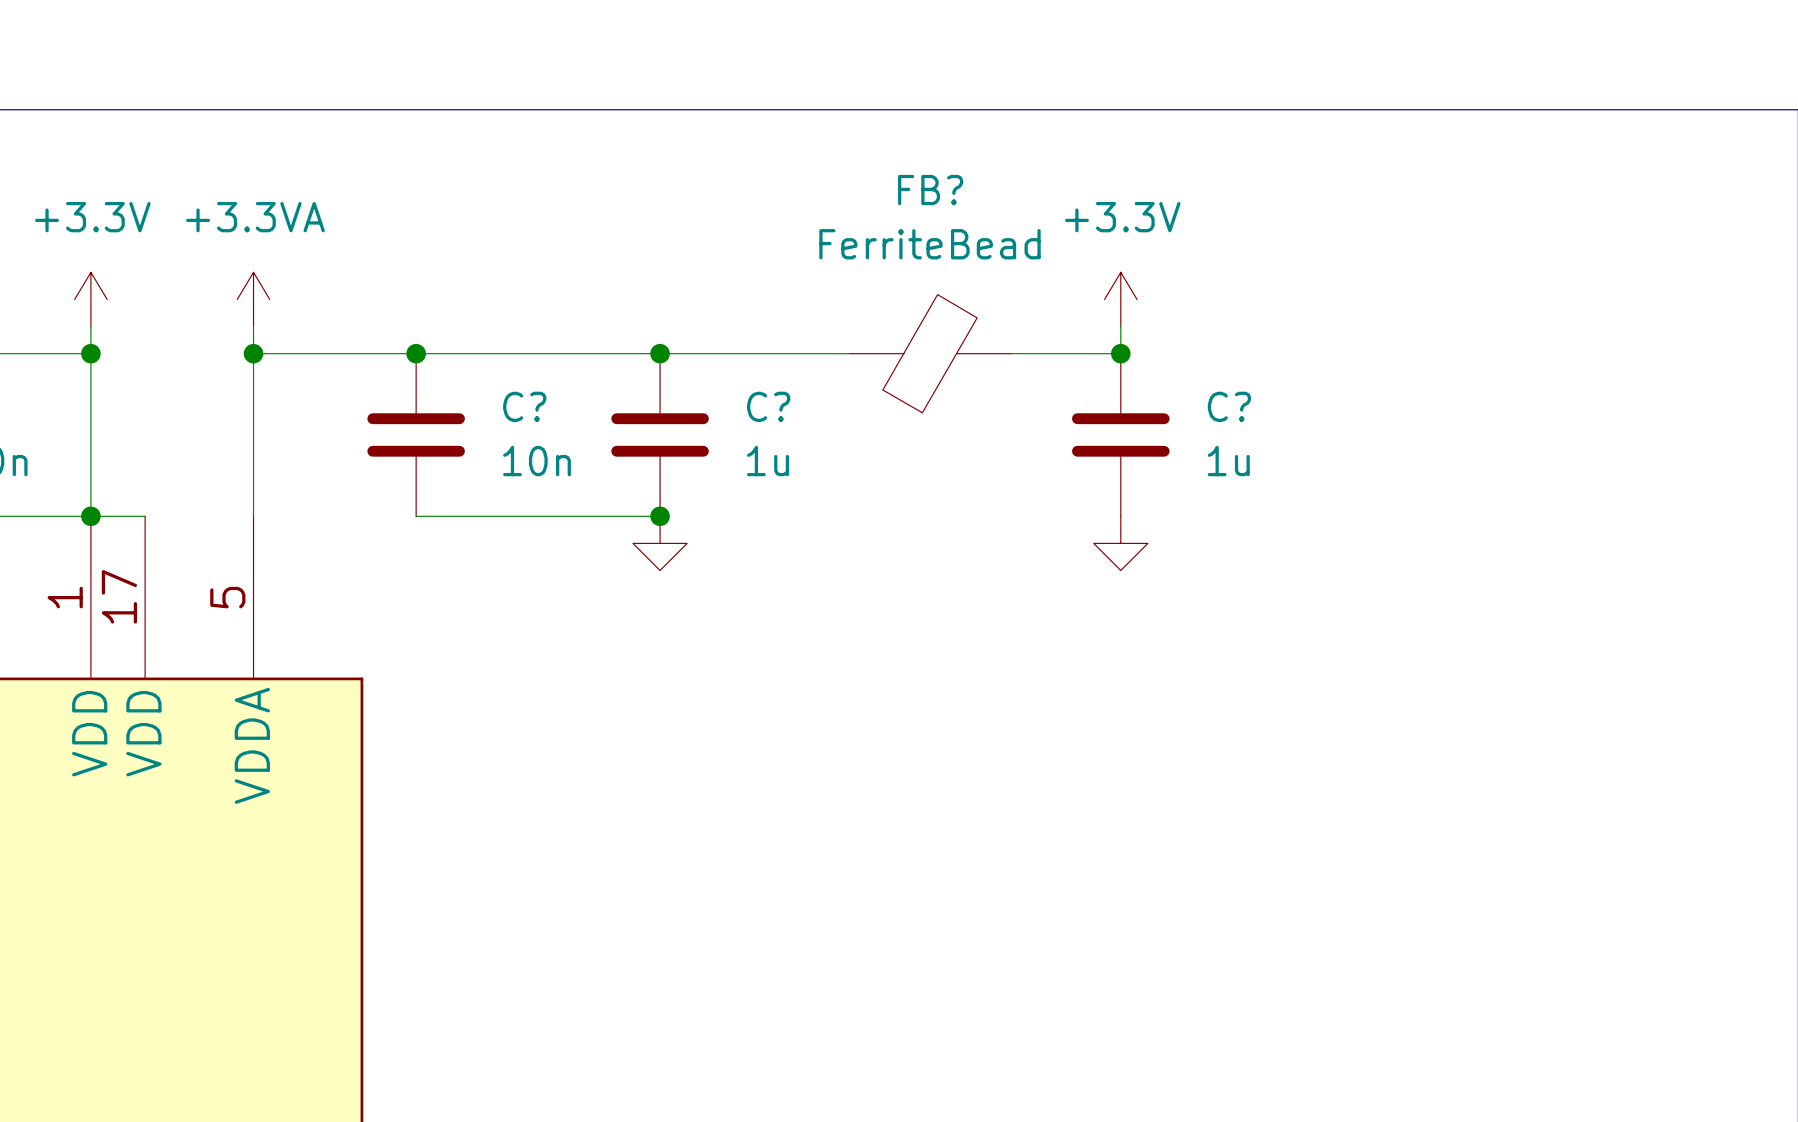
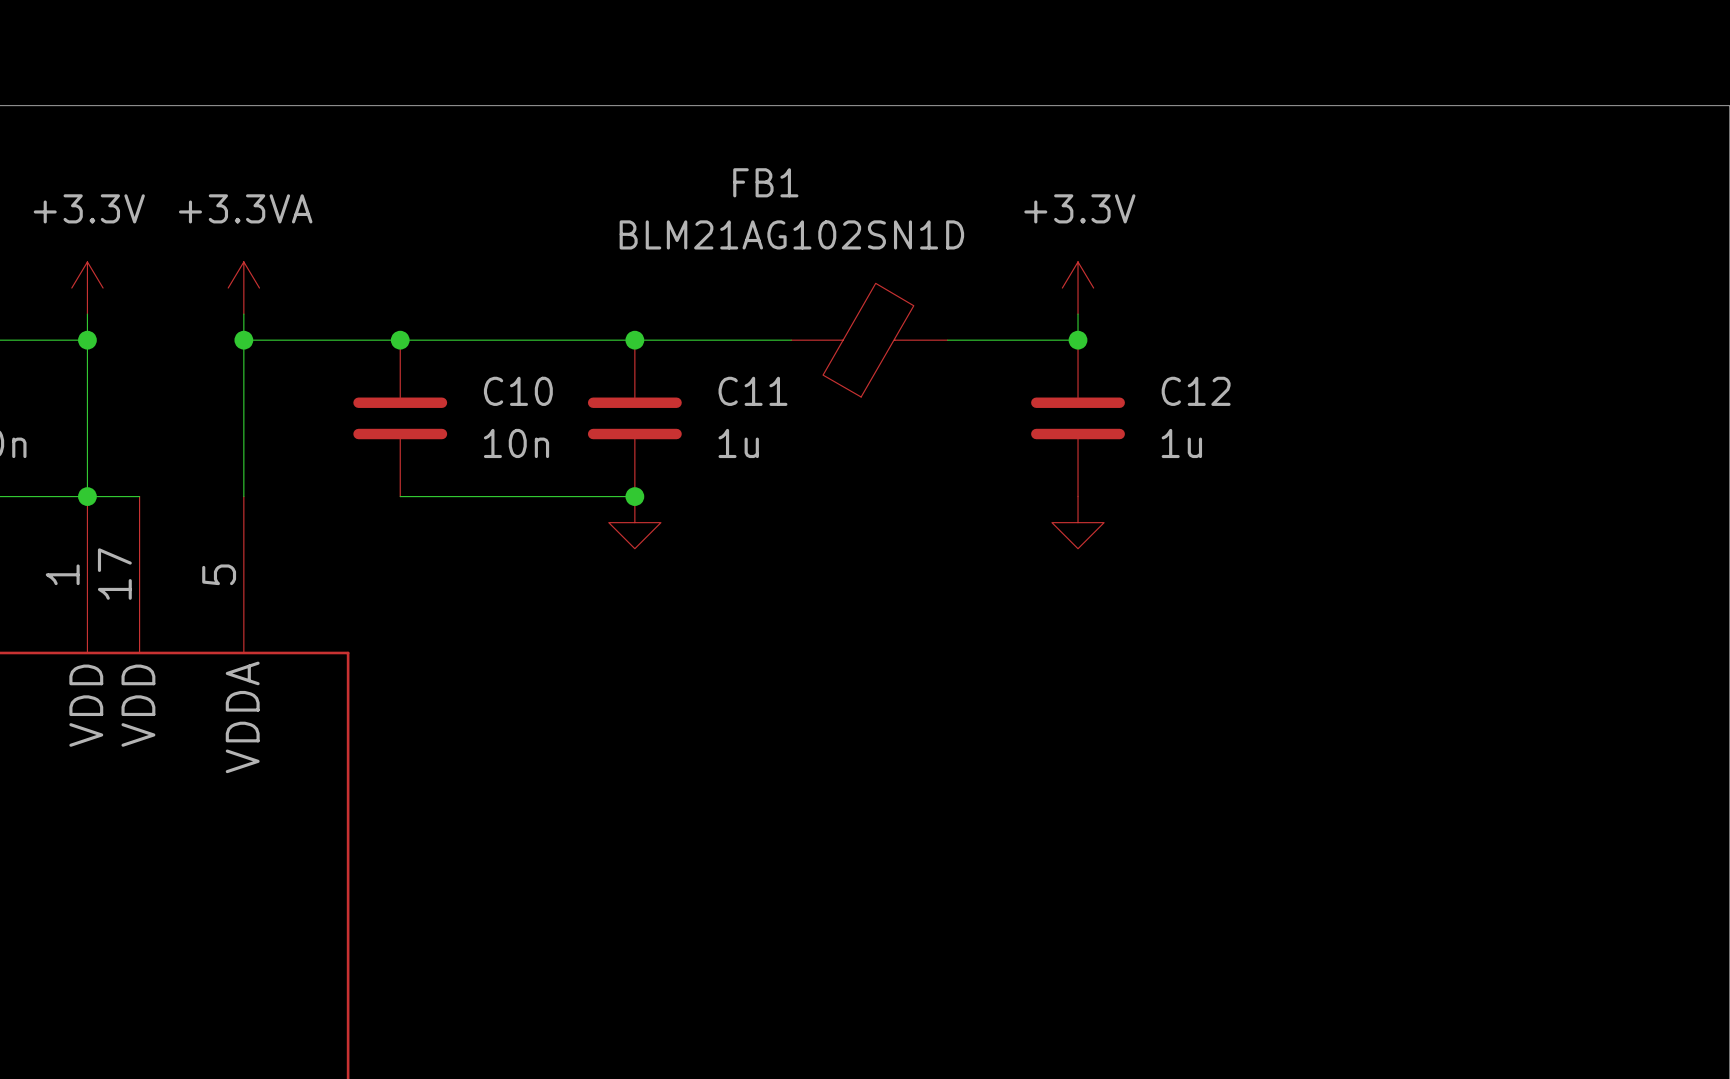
FB1: none -> BLM21AG102SN1D (869, 340)
FB?: FerriteBead (931, 353) -> none
C? name: C? (524, 406) -> C10 (518, 391)
C? name: C? (768, 406) -> C11 (752, 391)
C? name: C? (1229, 406) -> C12 (1196, 391)

